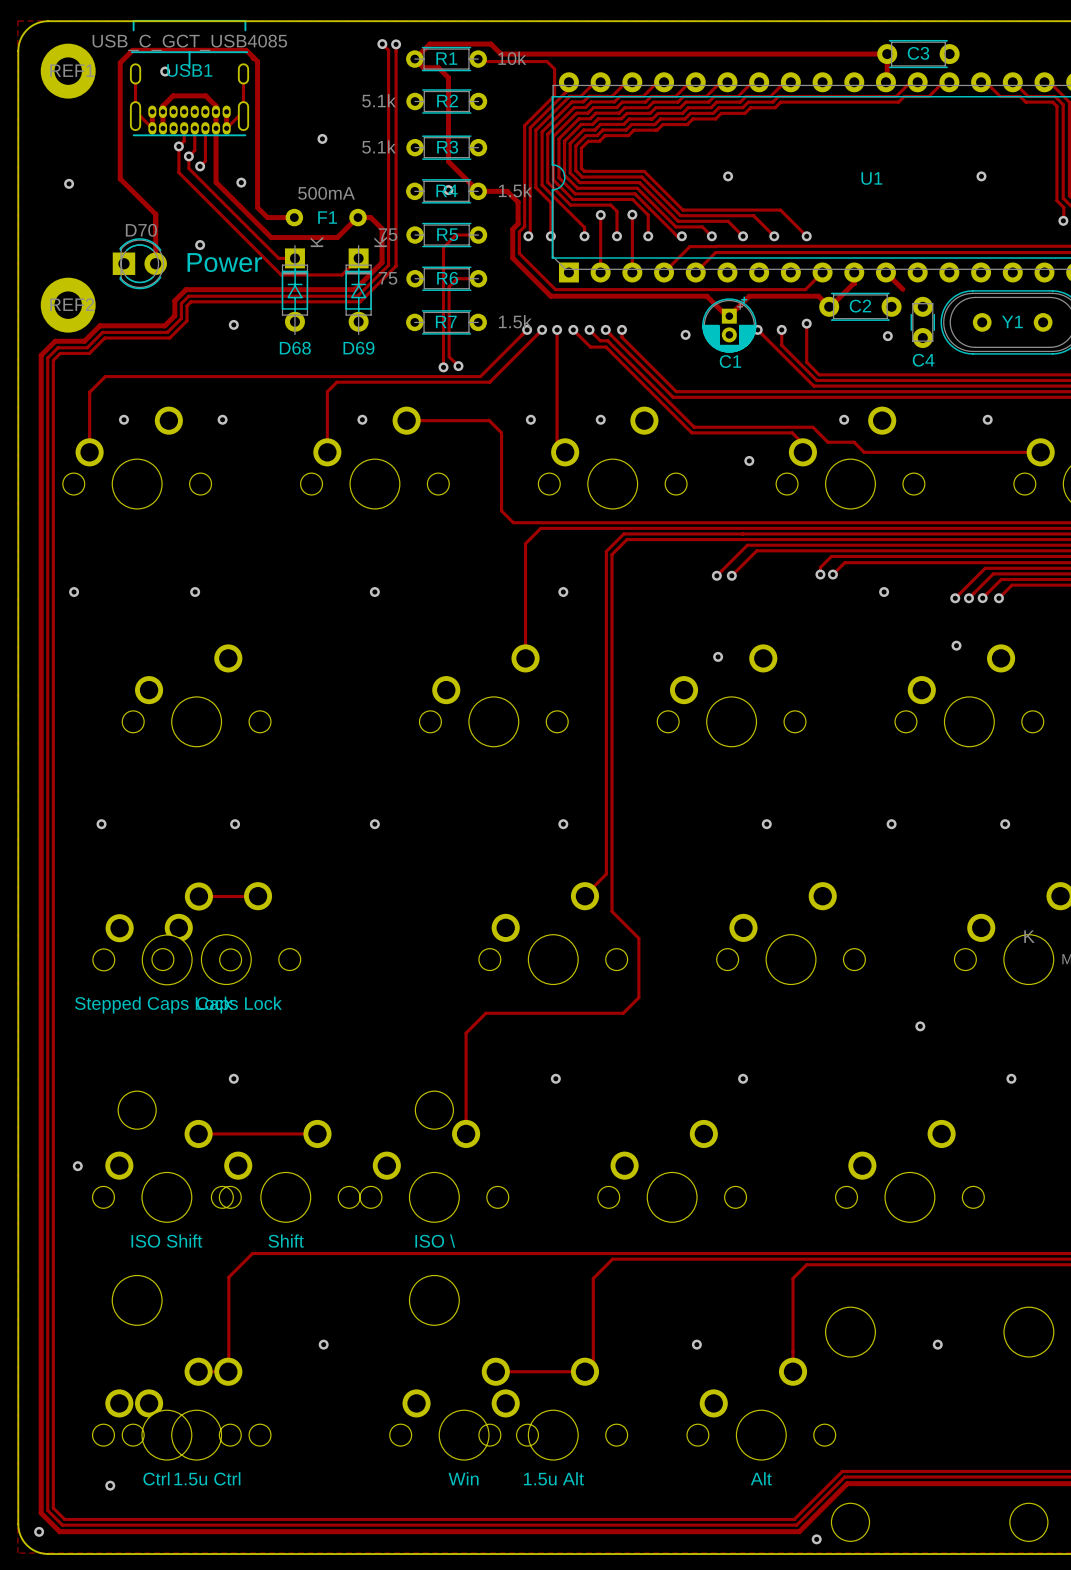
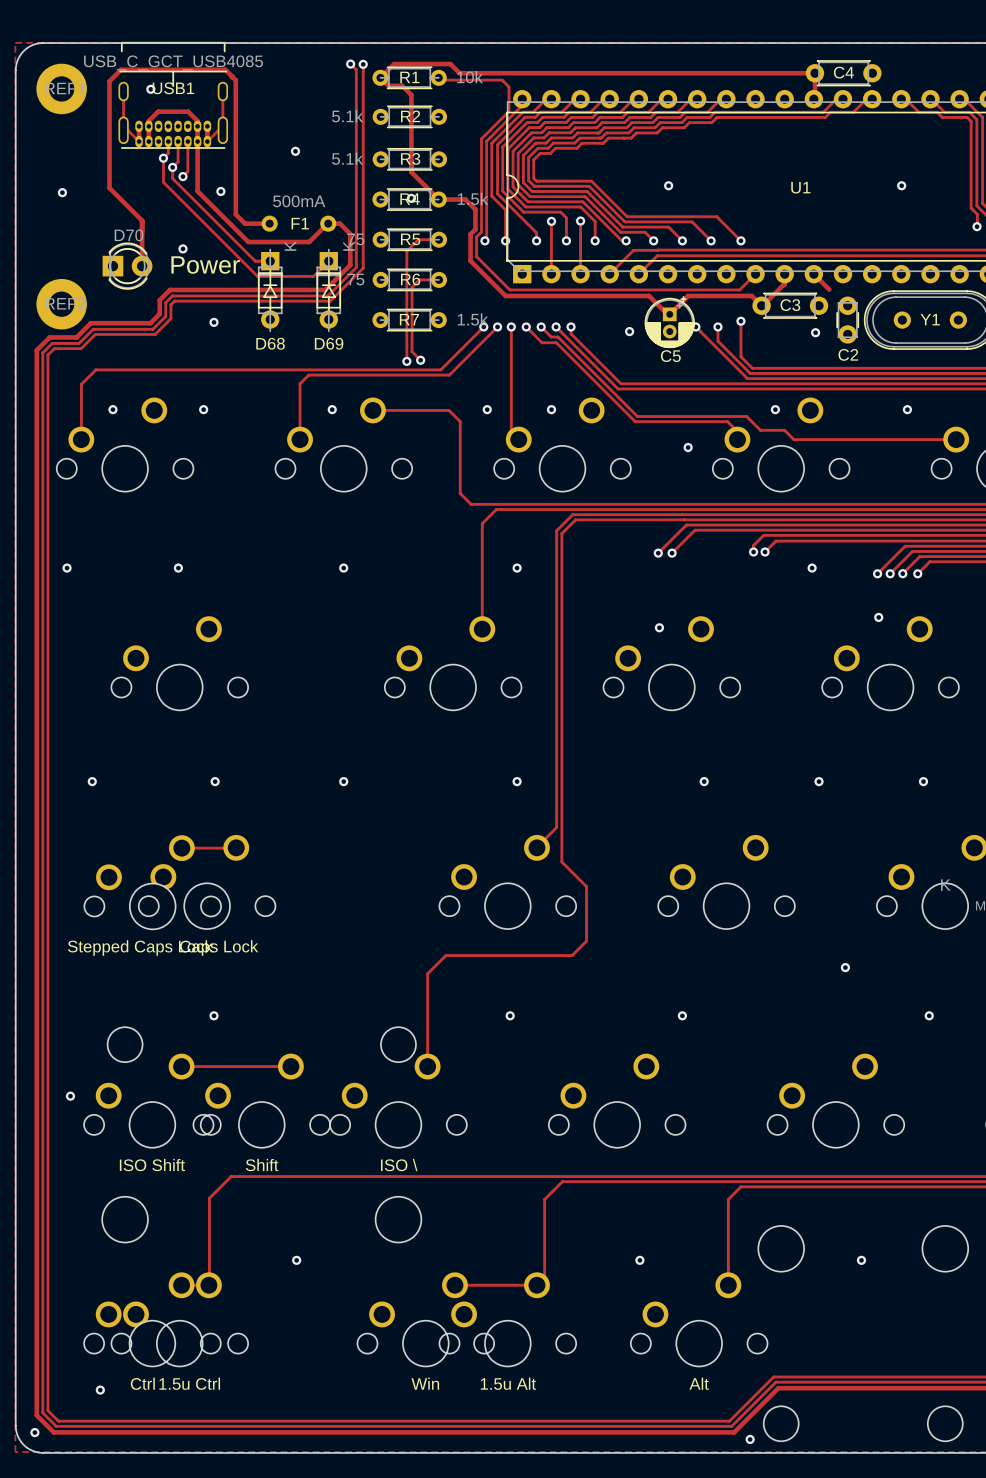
C3 name: C3 (918, 53) -> C4 (843, 72)
C2 name: C2 (860, 306) -> C3 (790, 305)
C4 name: C4 (923, 360) -> C2 (848, 354)
C1 name: C1 (730, 361) -> C5 (670, 356)

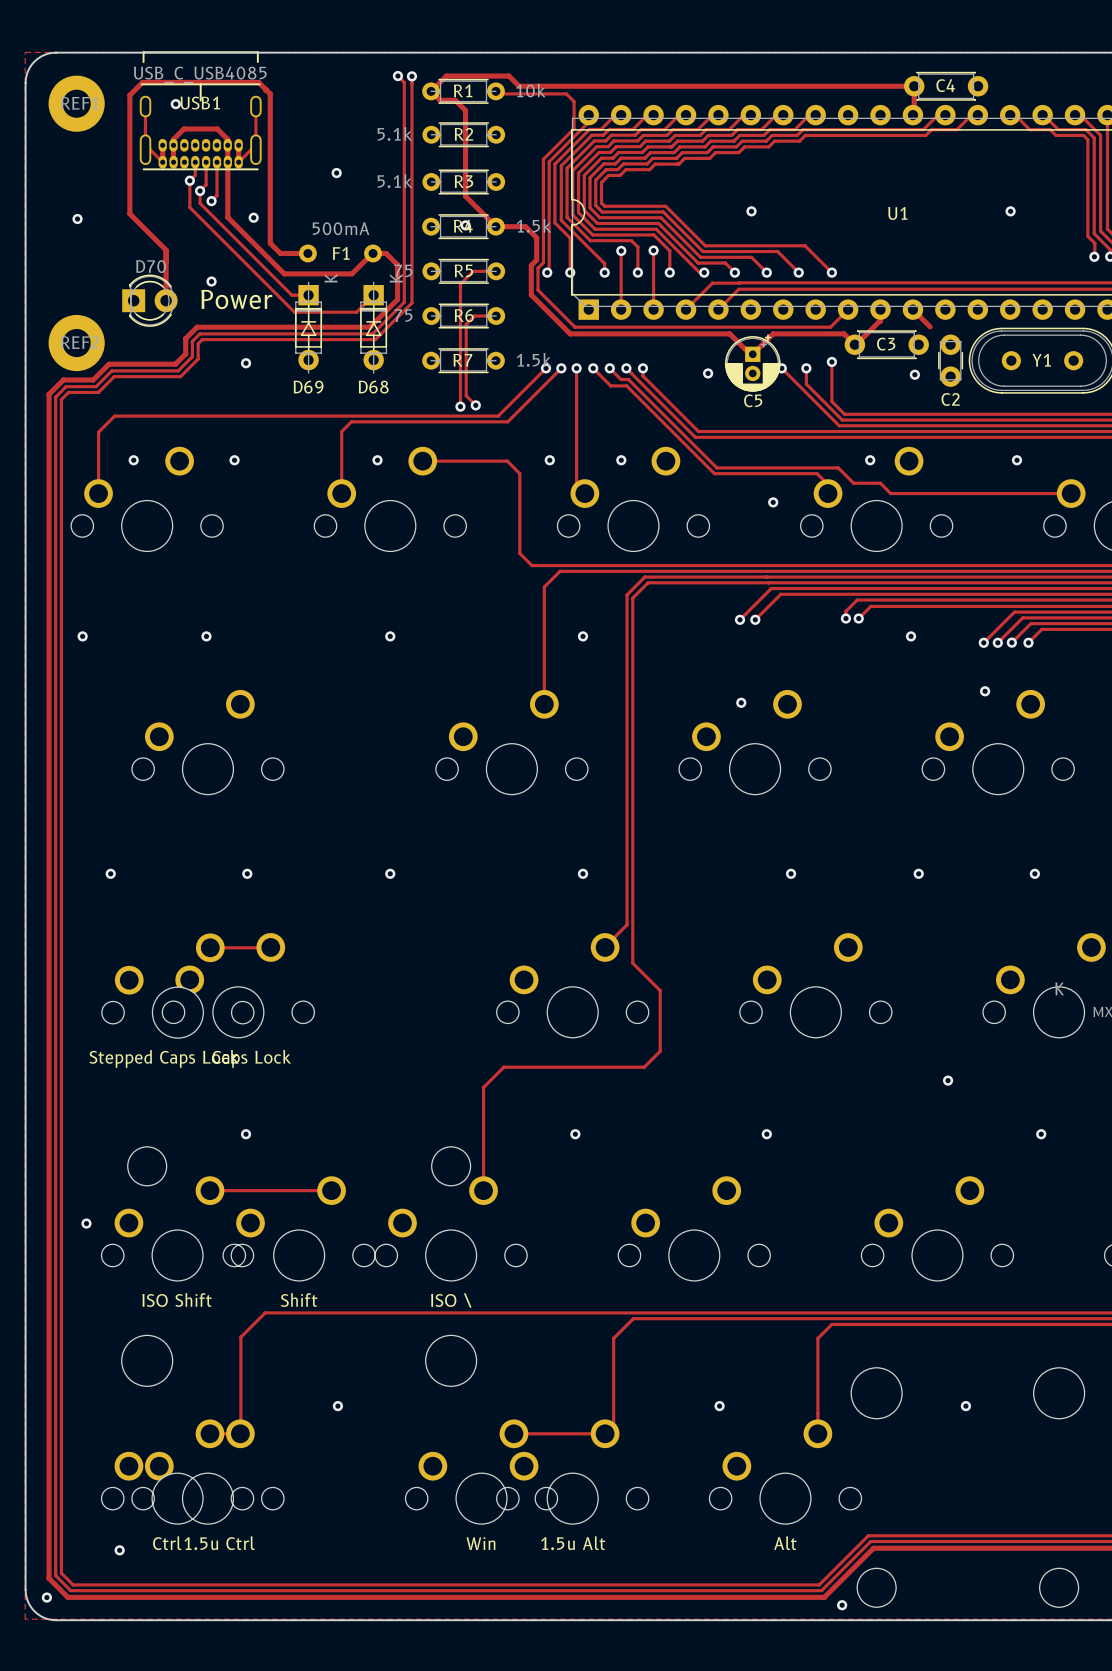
USB1 value: USB_C_GCT_USB4085 (173, 62) -> USB_C_USB4085 (200, 74)
D68 name: D68 (270, 343) -> D69 (308, 387)
D69 name: D69 (329, 343) -> D68 (373, 387)

